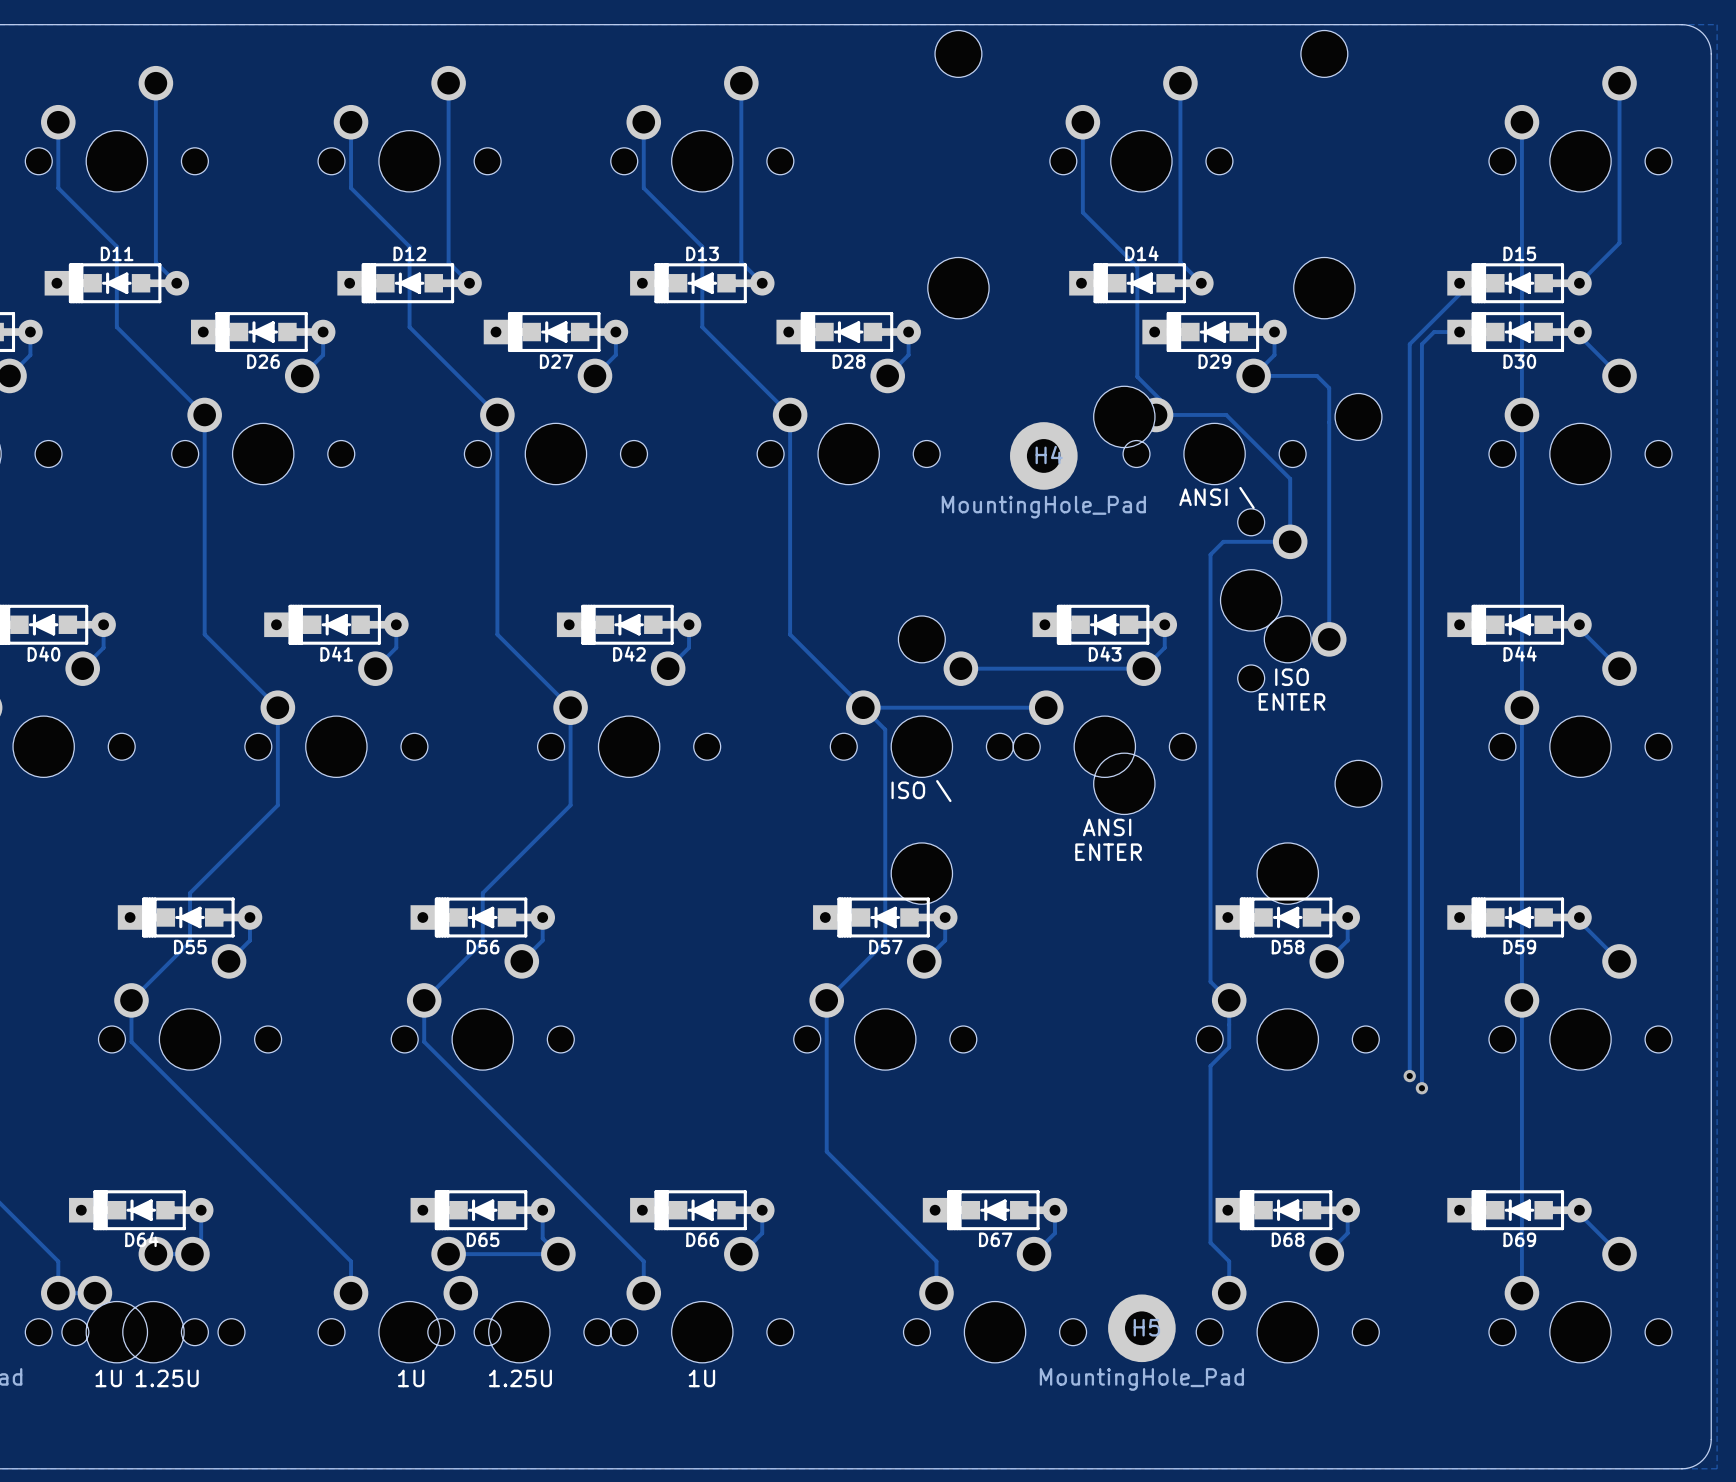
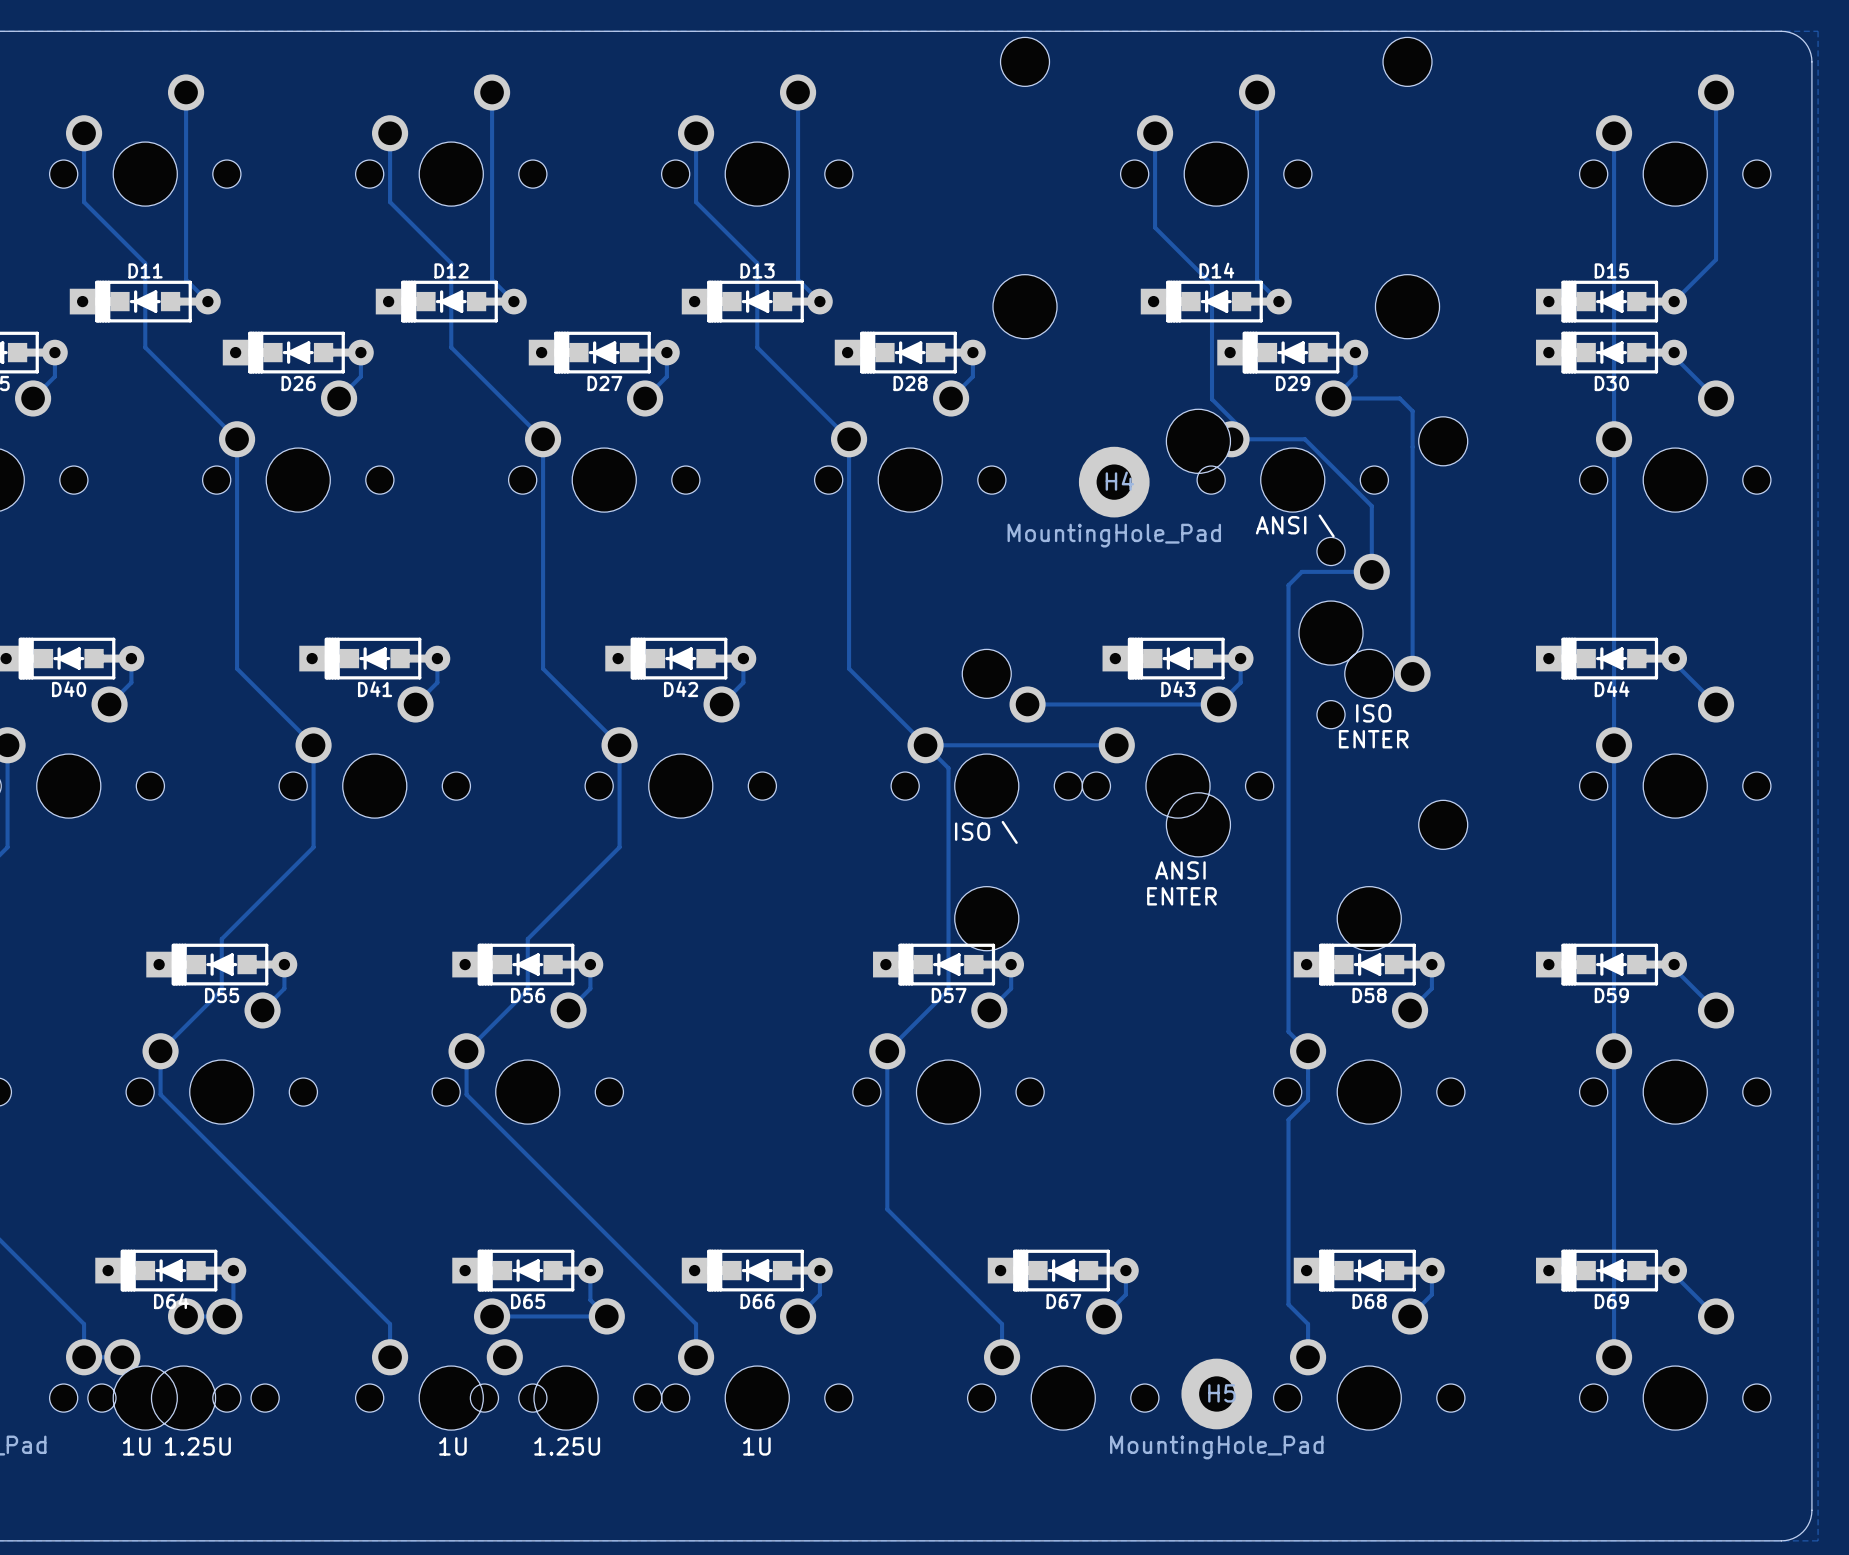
track: (1459, 283) (1459, 294) (1409, 344) (1409, 1076) -> none
track: (1459, 332) (1434, 332) (1421, 344) (1421, 1088) -> none
via: (1409, 1076) -> none
via: (1421, 1088) -> none

